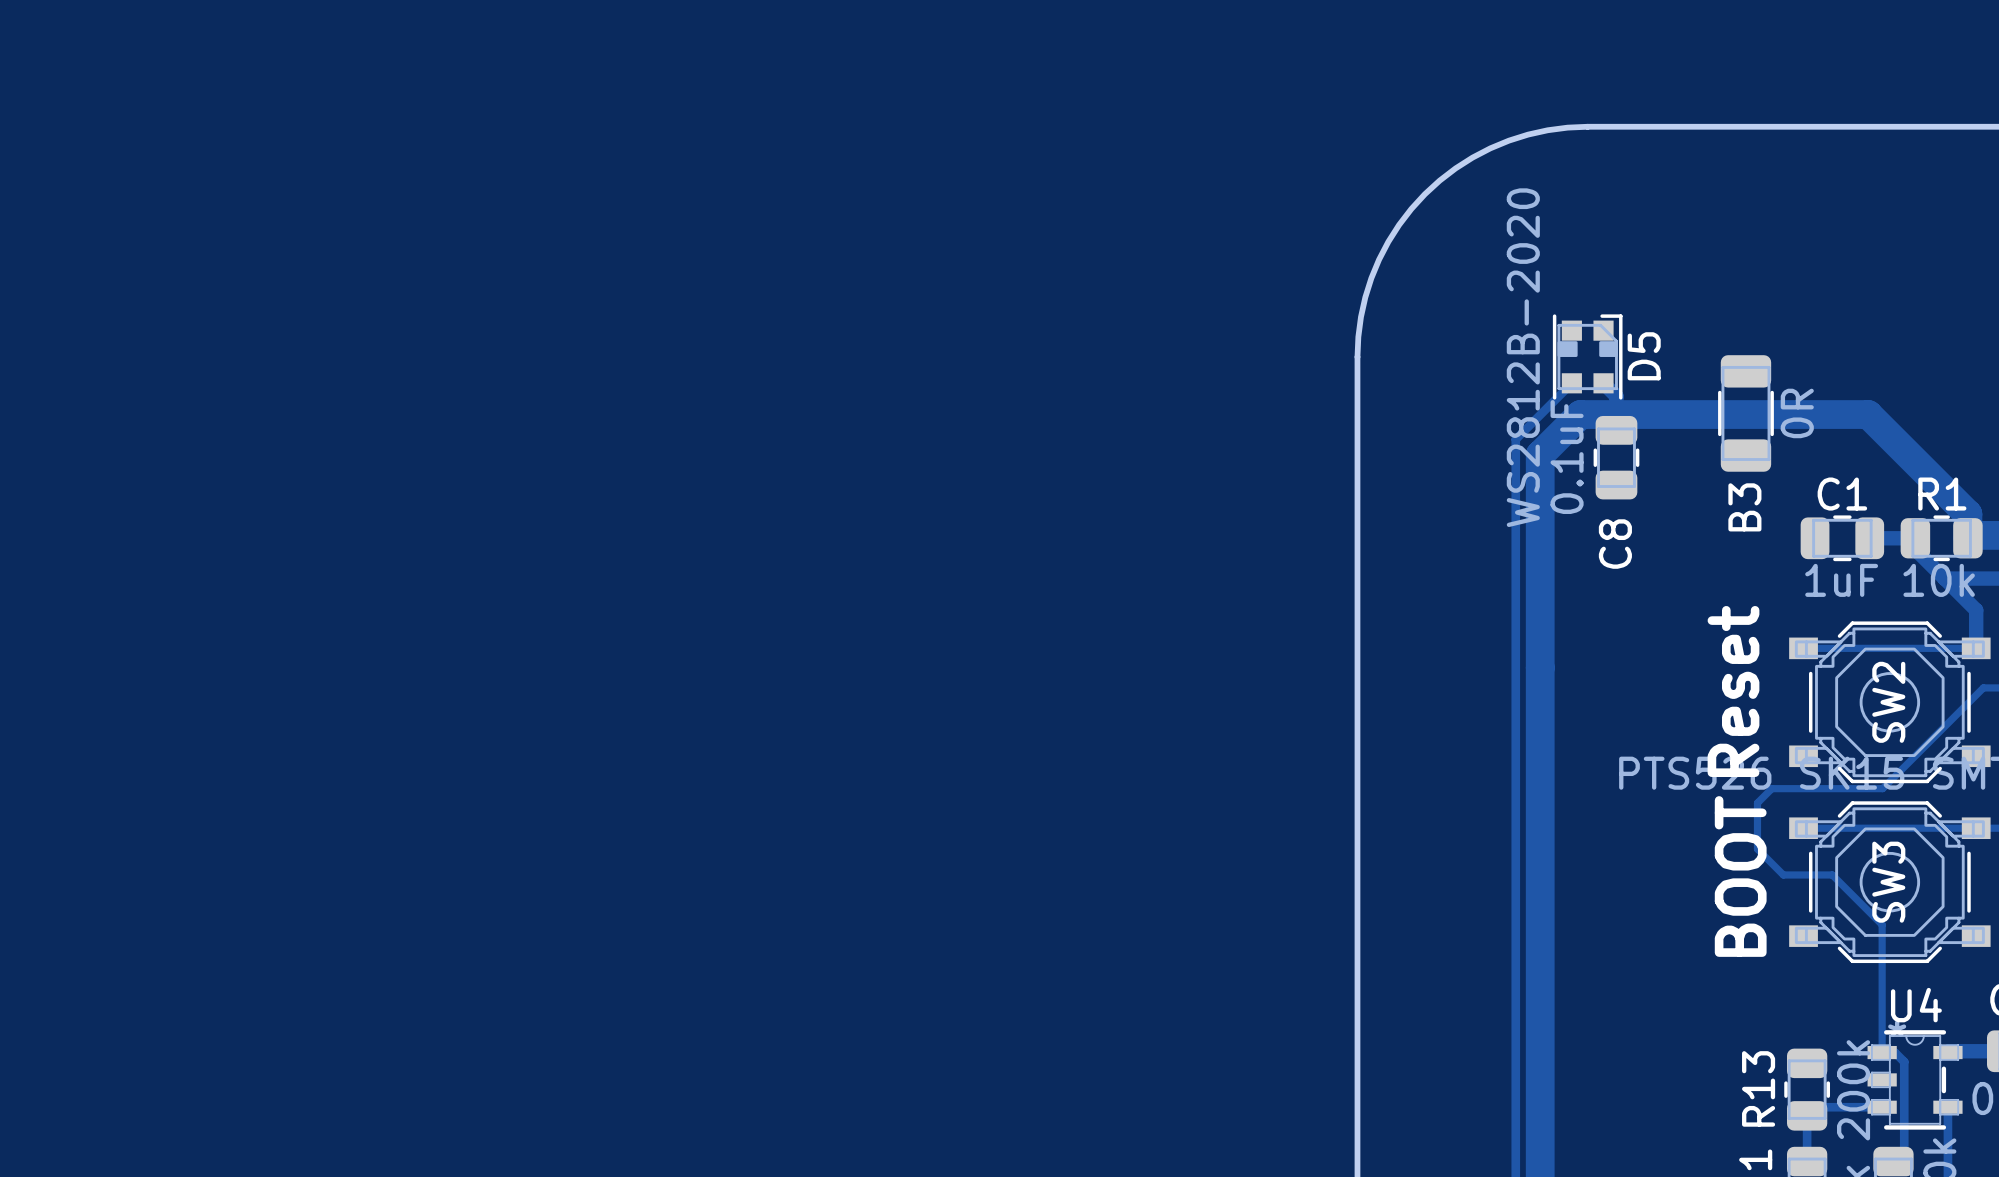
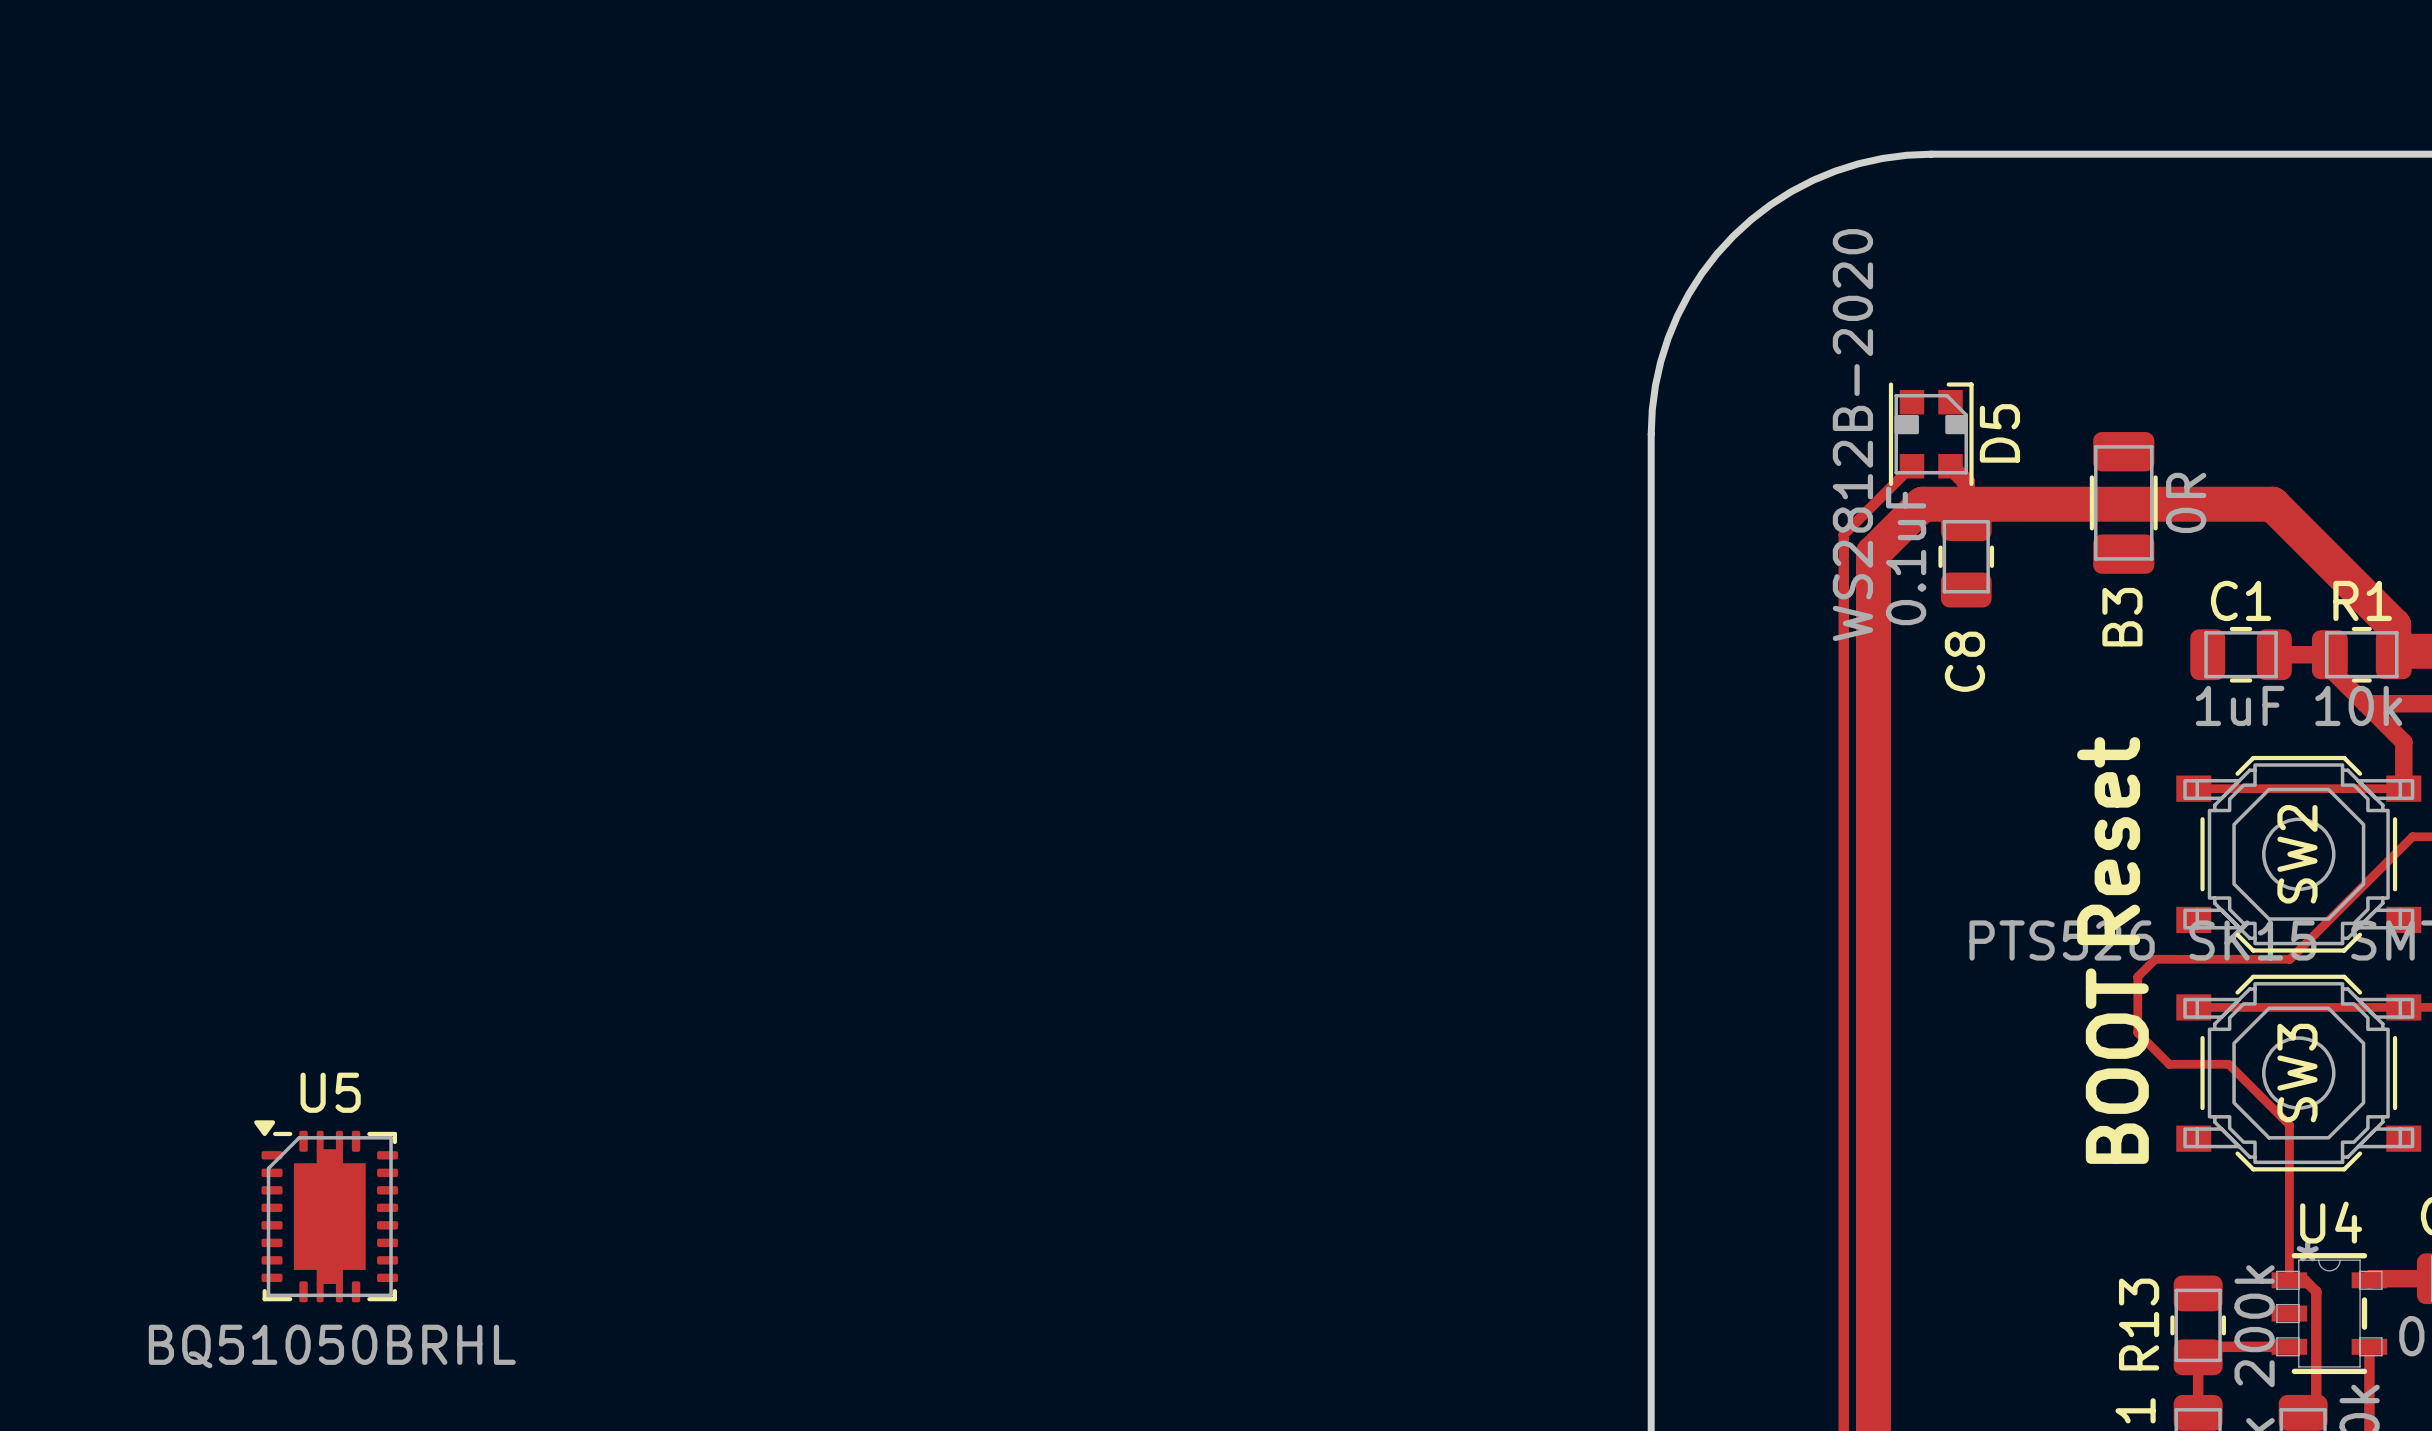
U5: none -> BQ51050BRHL (326, 1211)

